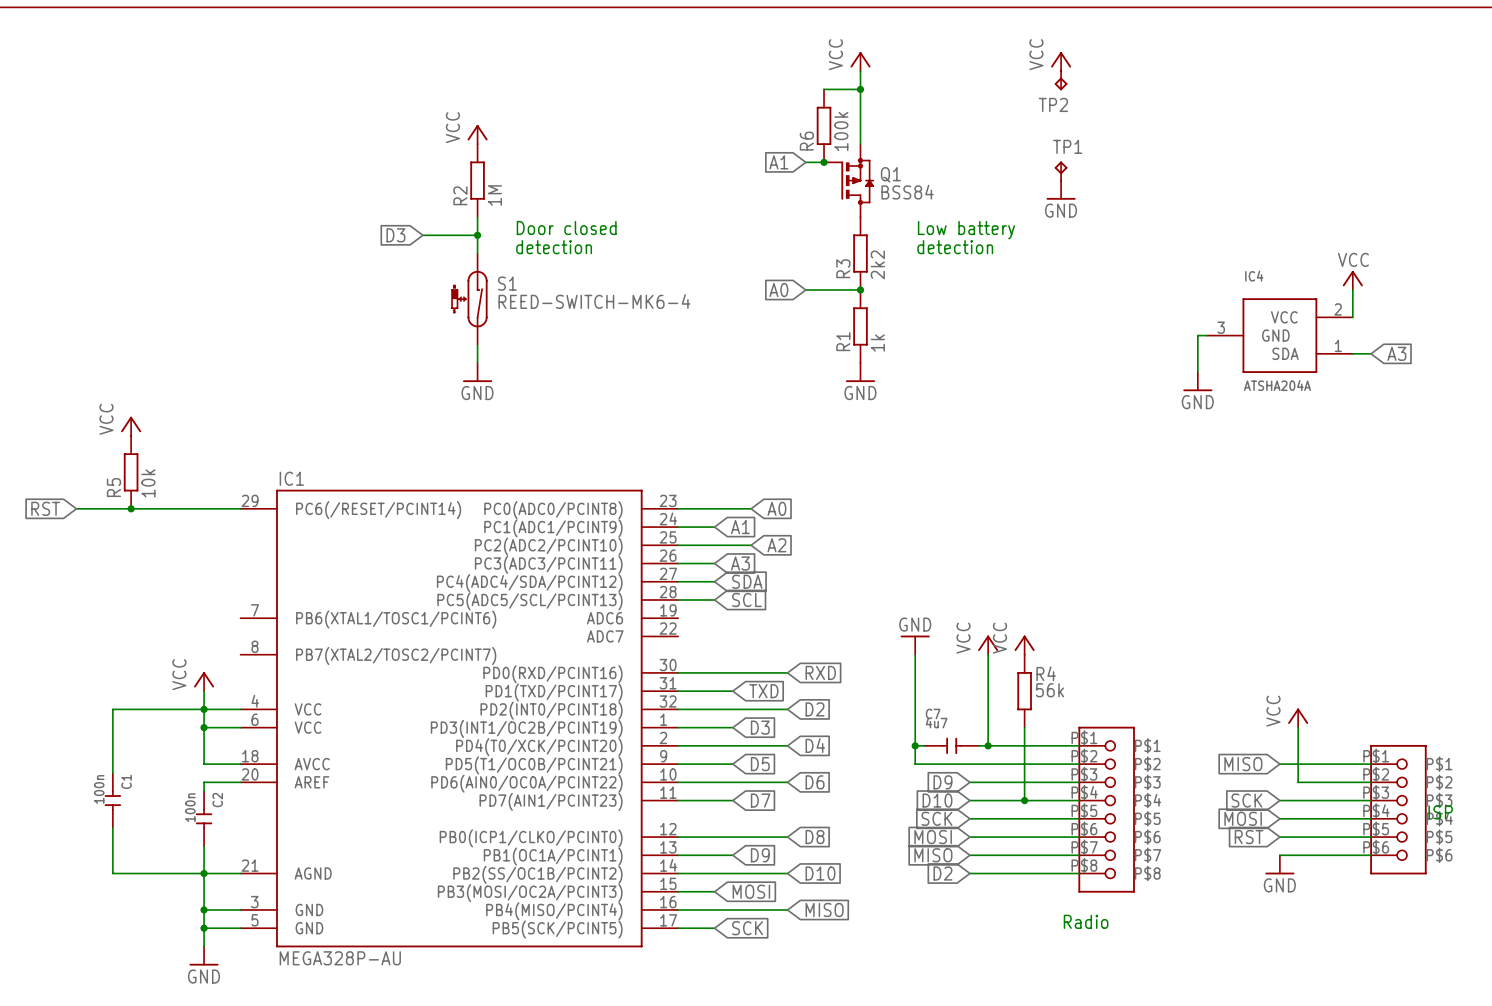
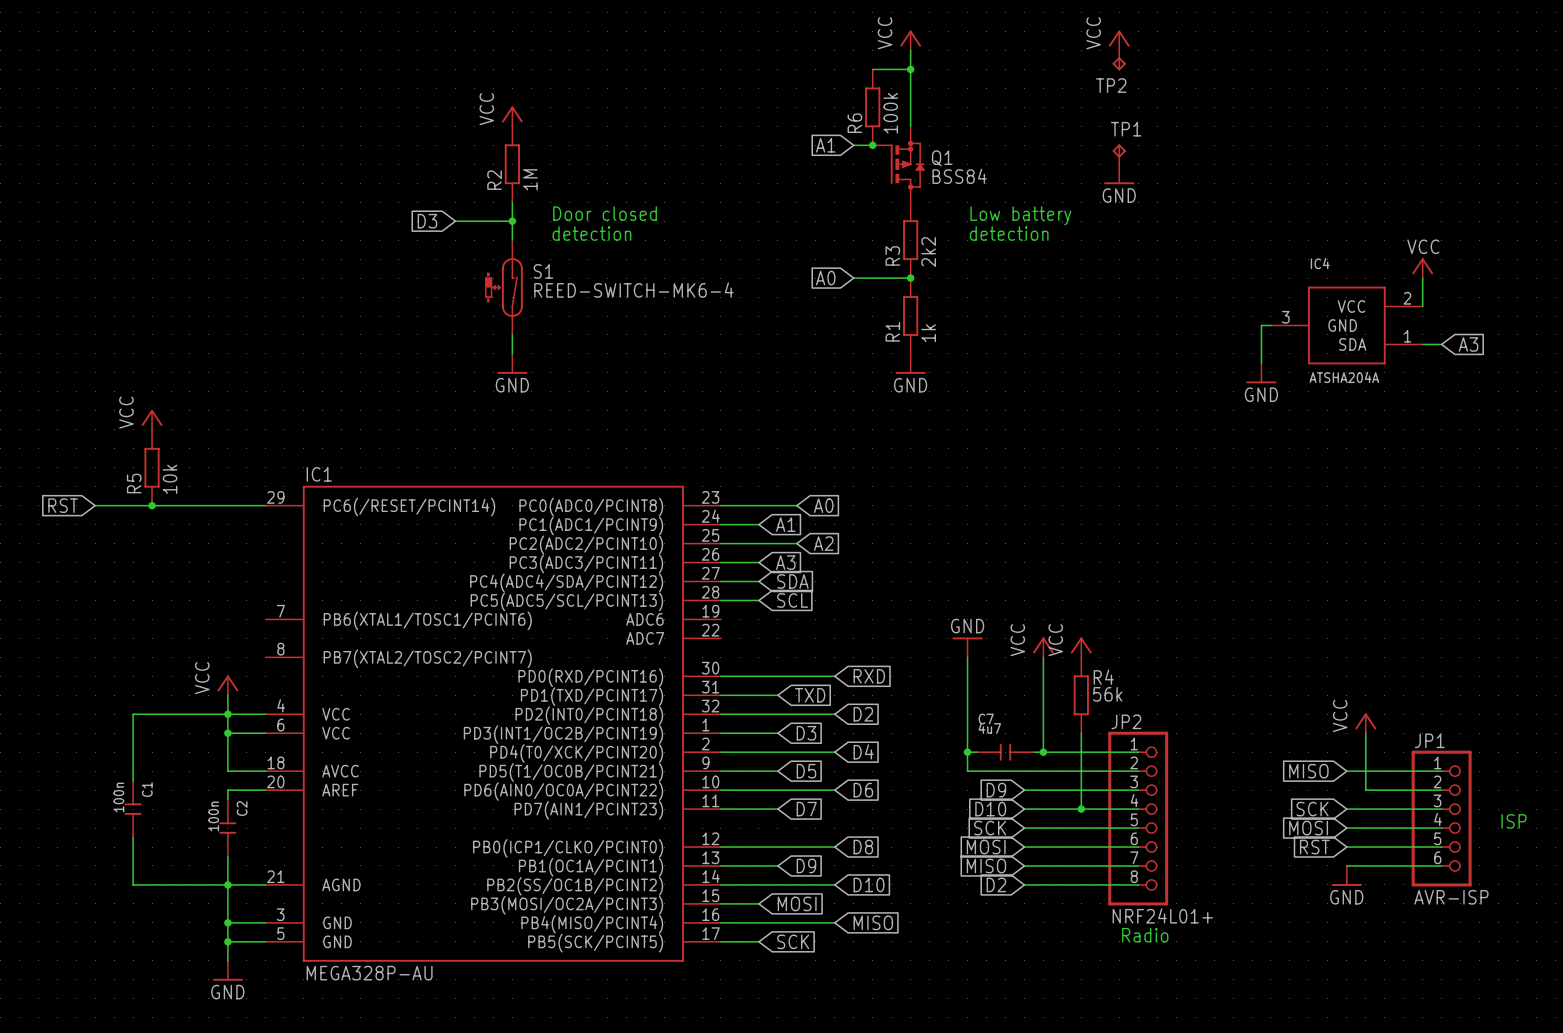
JP2: none -> NRF24L01+ (1138, 818)
part: (1106, 809) -> none
JP1: none -> AVR-ISP (1441, 818)
part: (1398, 809) -> none

